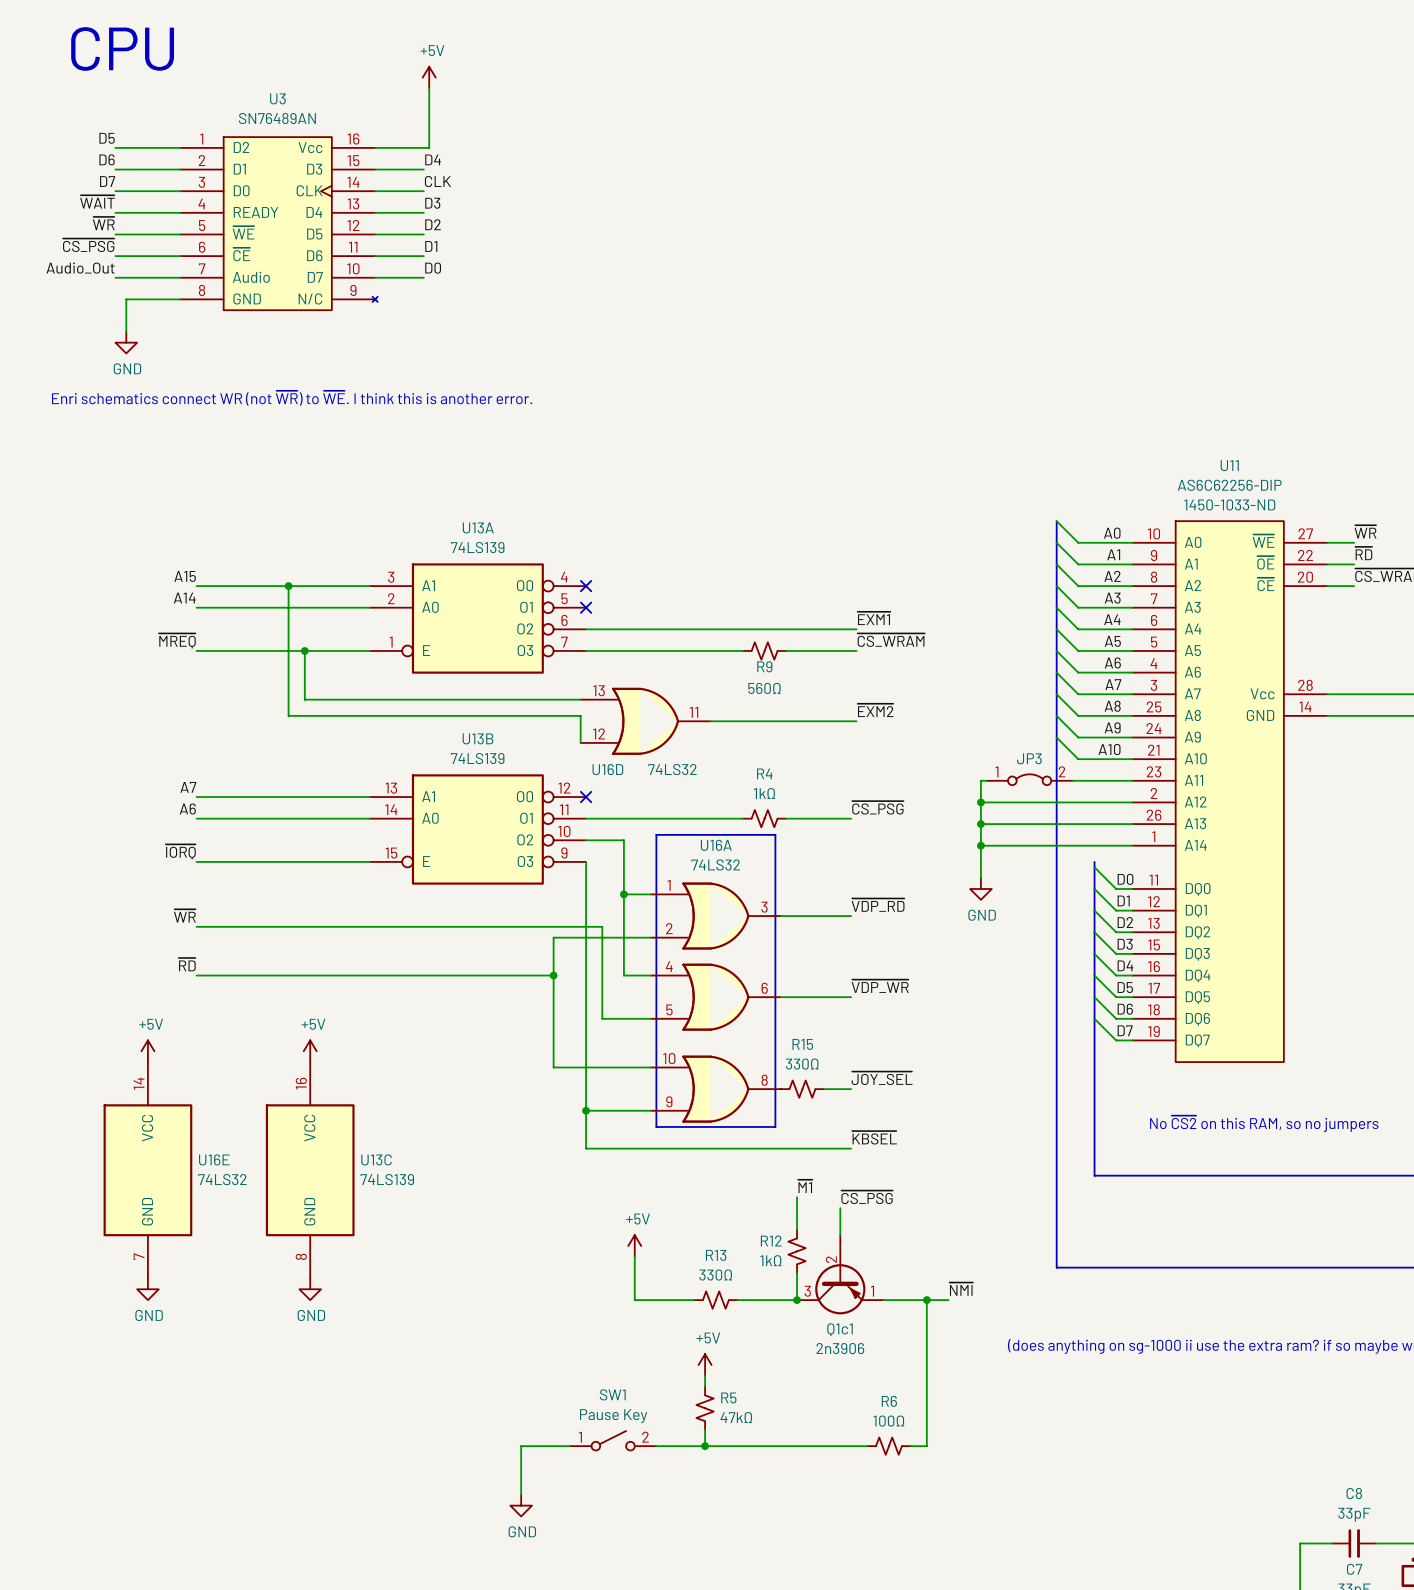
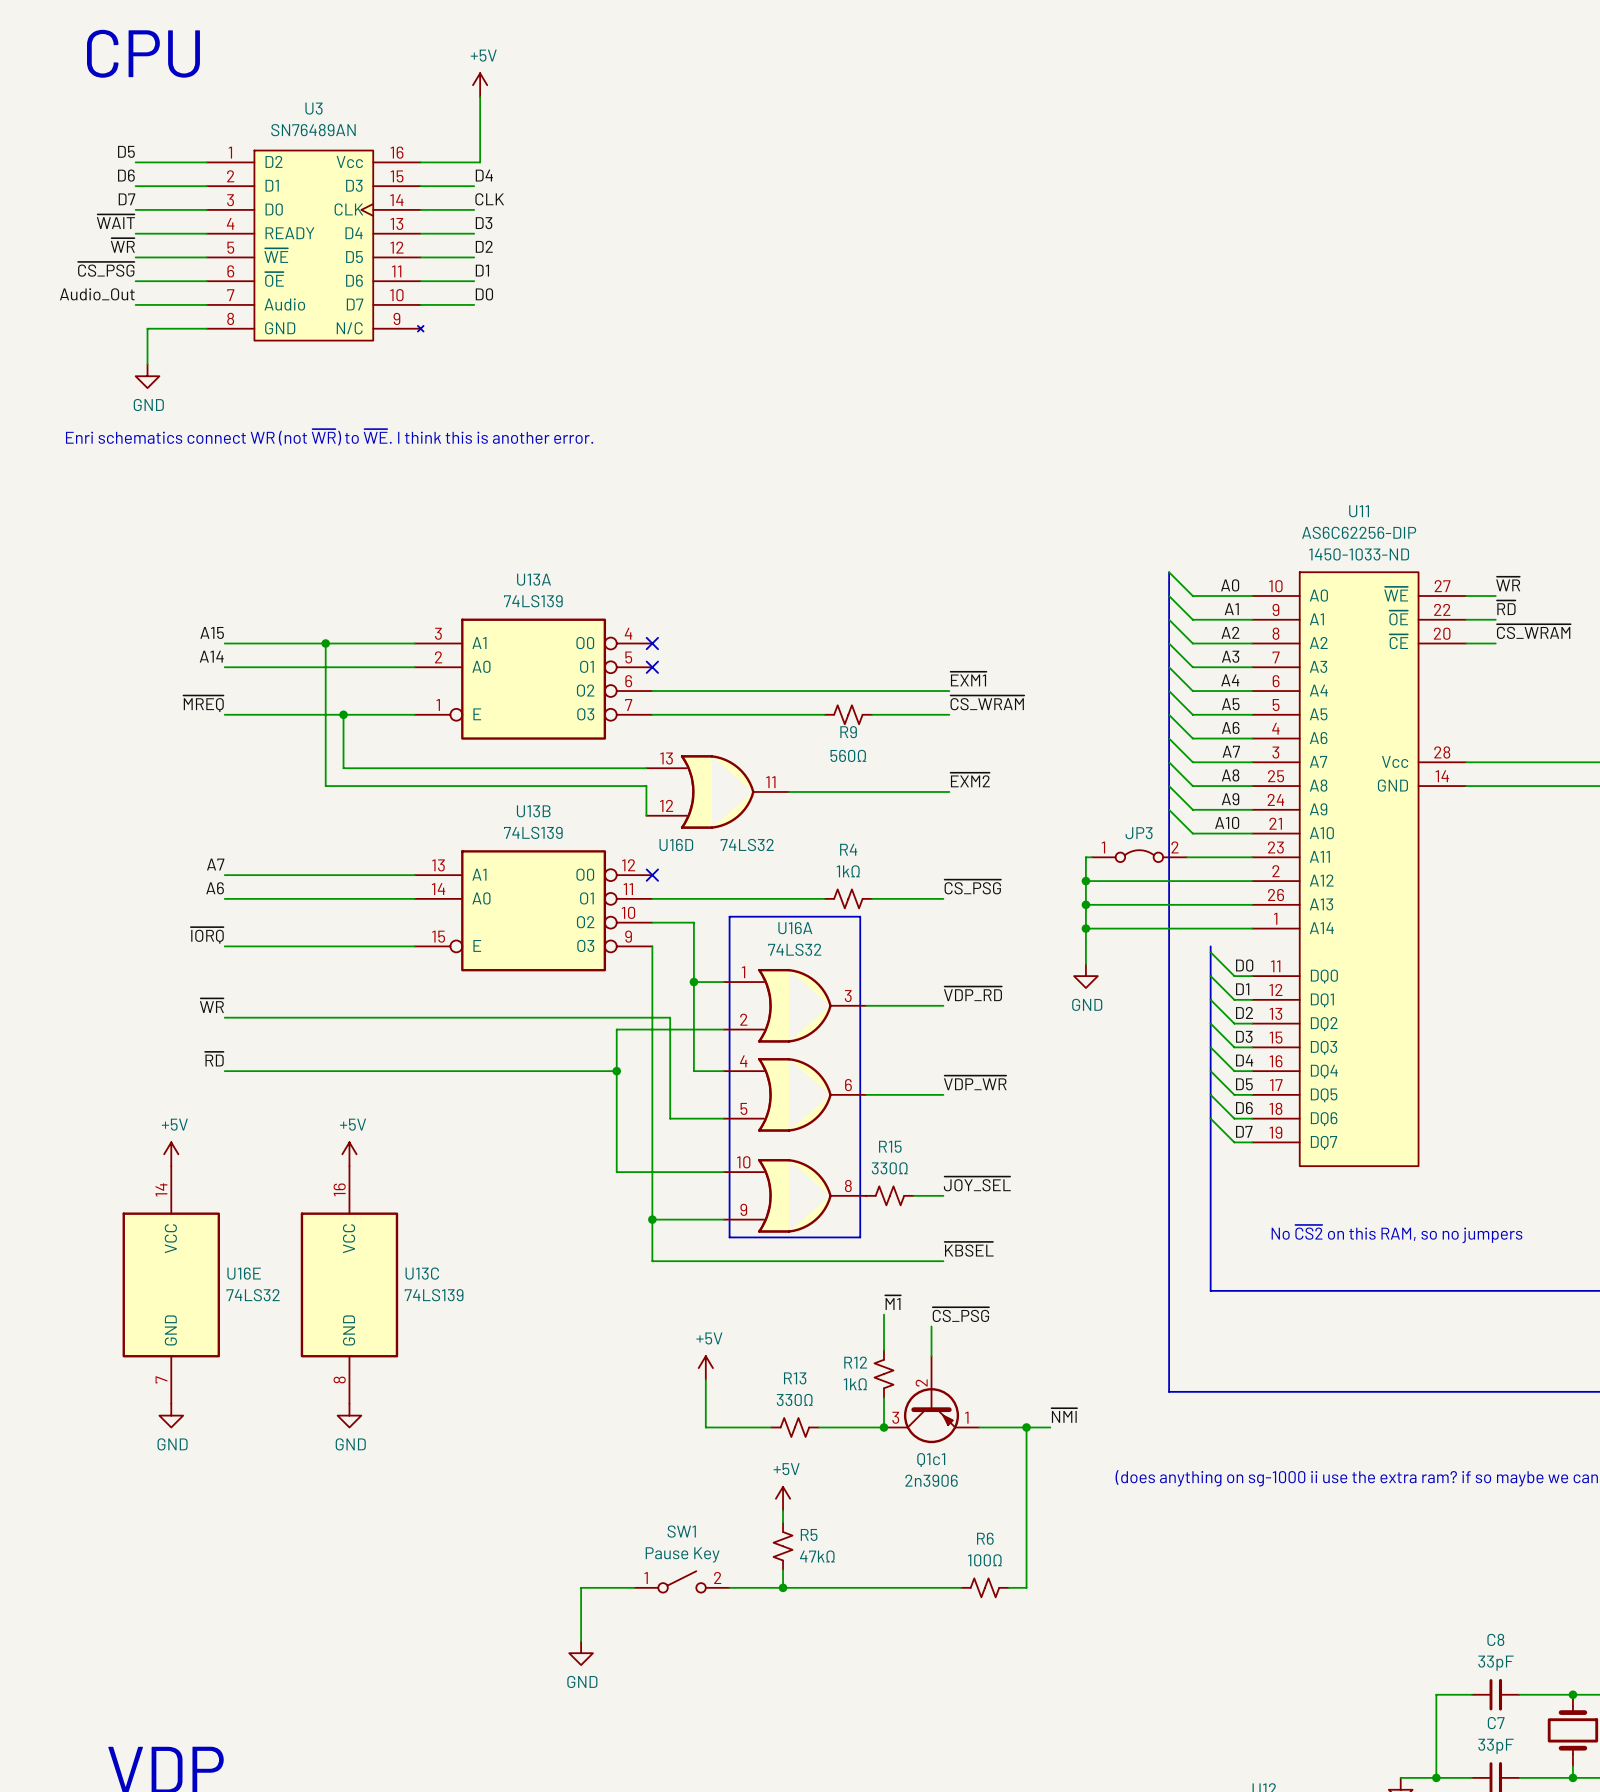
U3 pin name: ~{CE} (241, 254) -> ~{OE} (274, 279)

